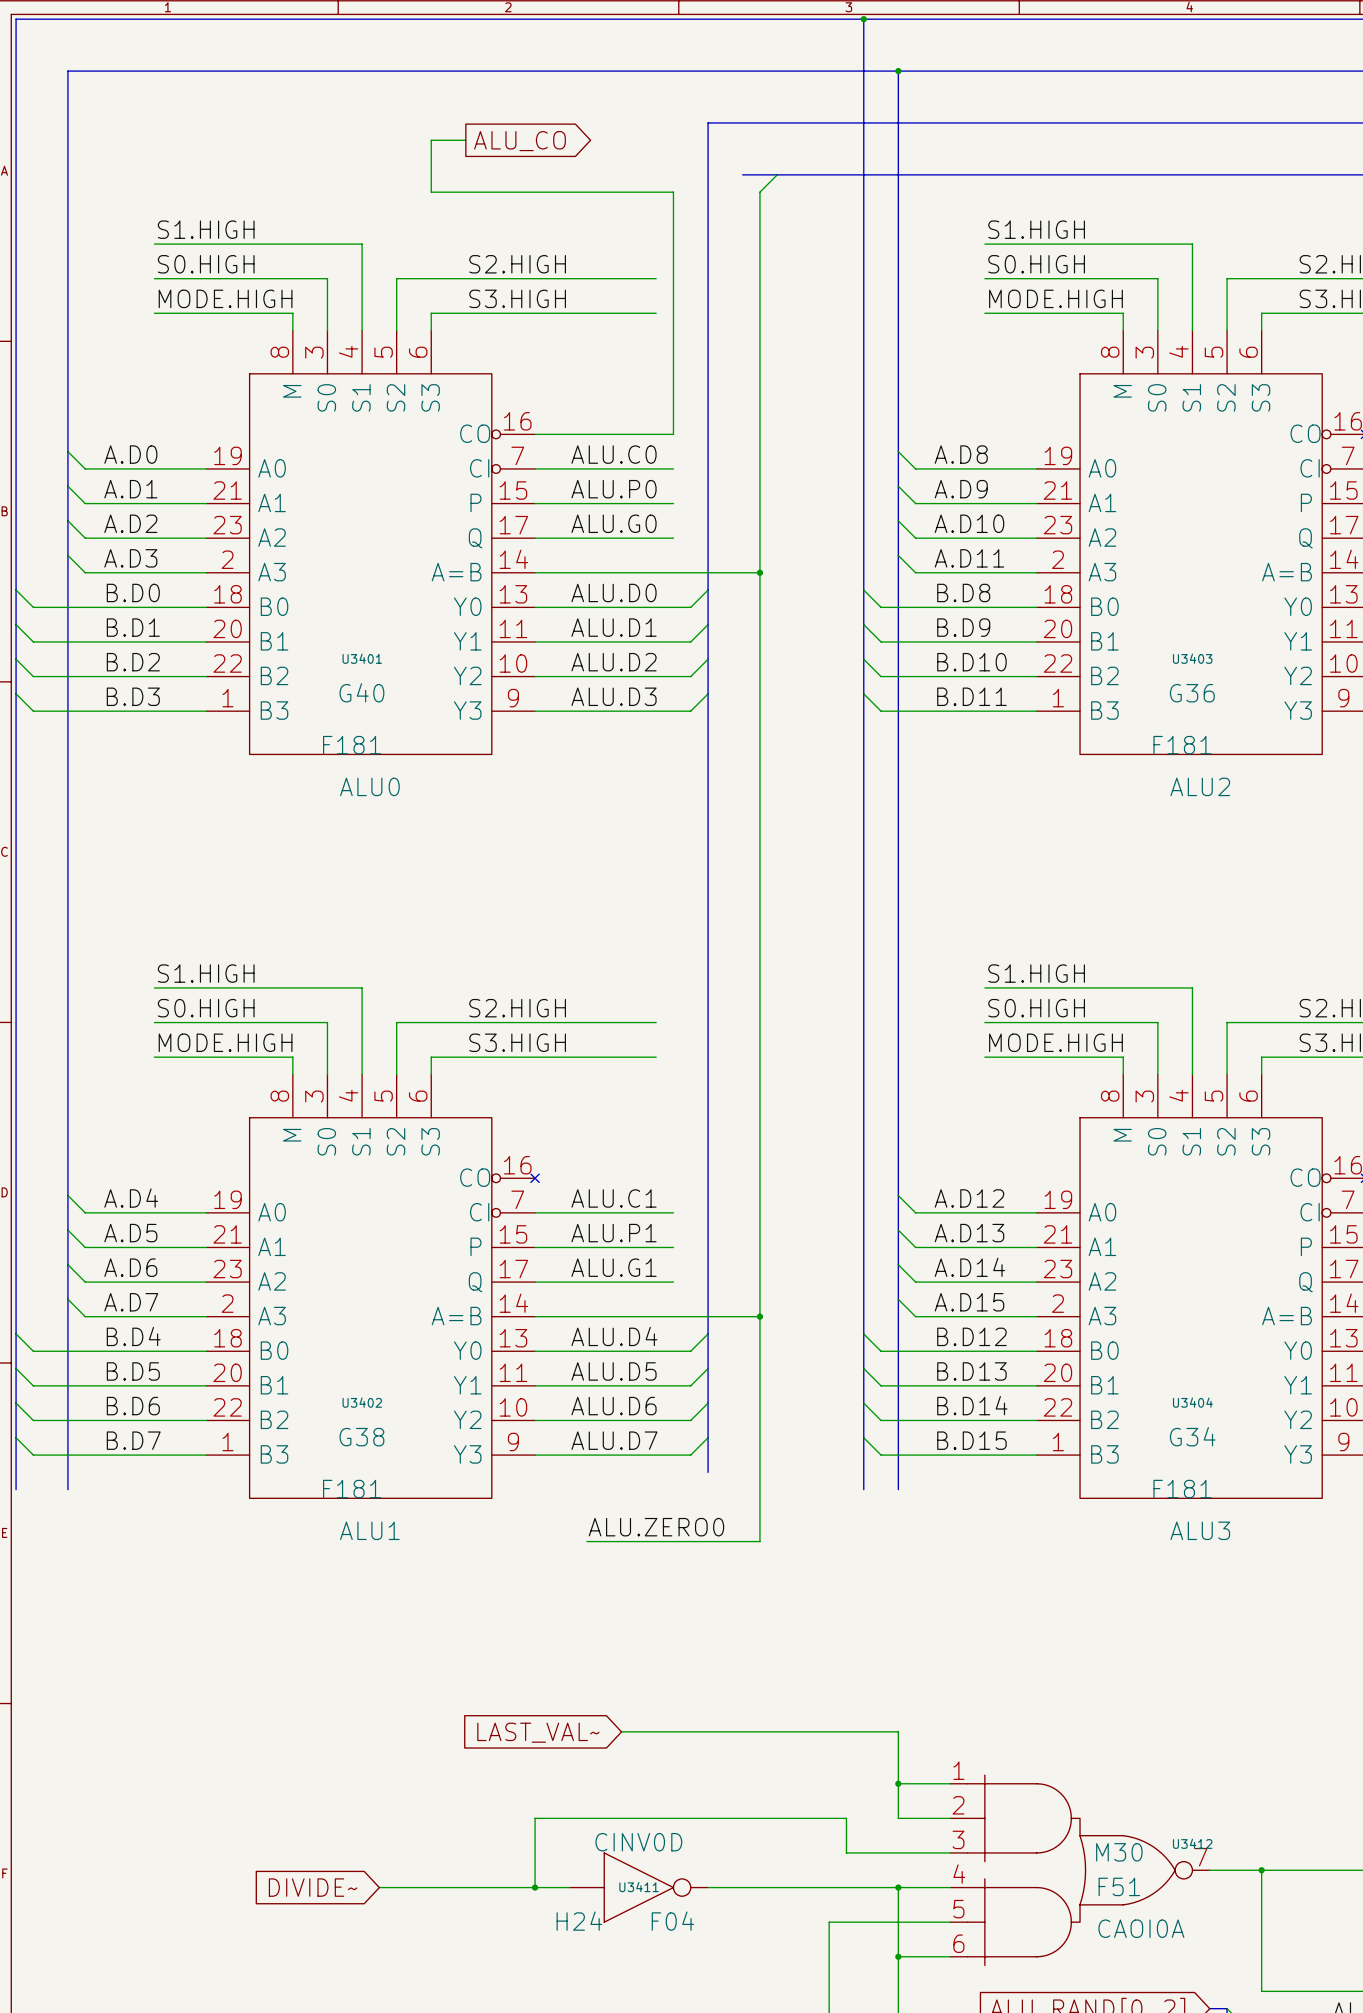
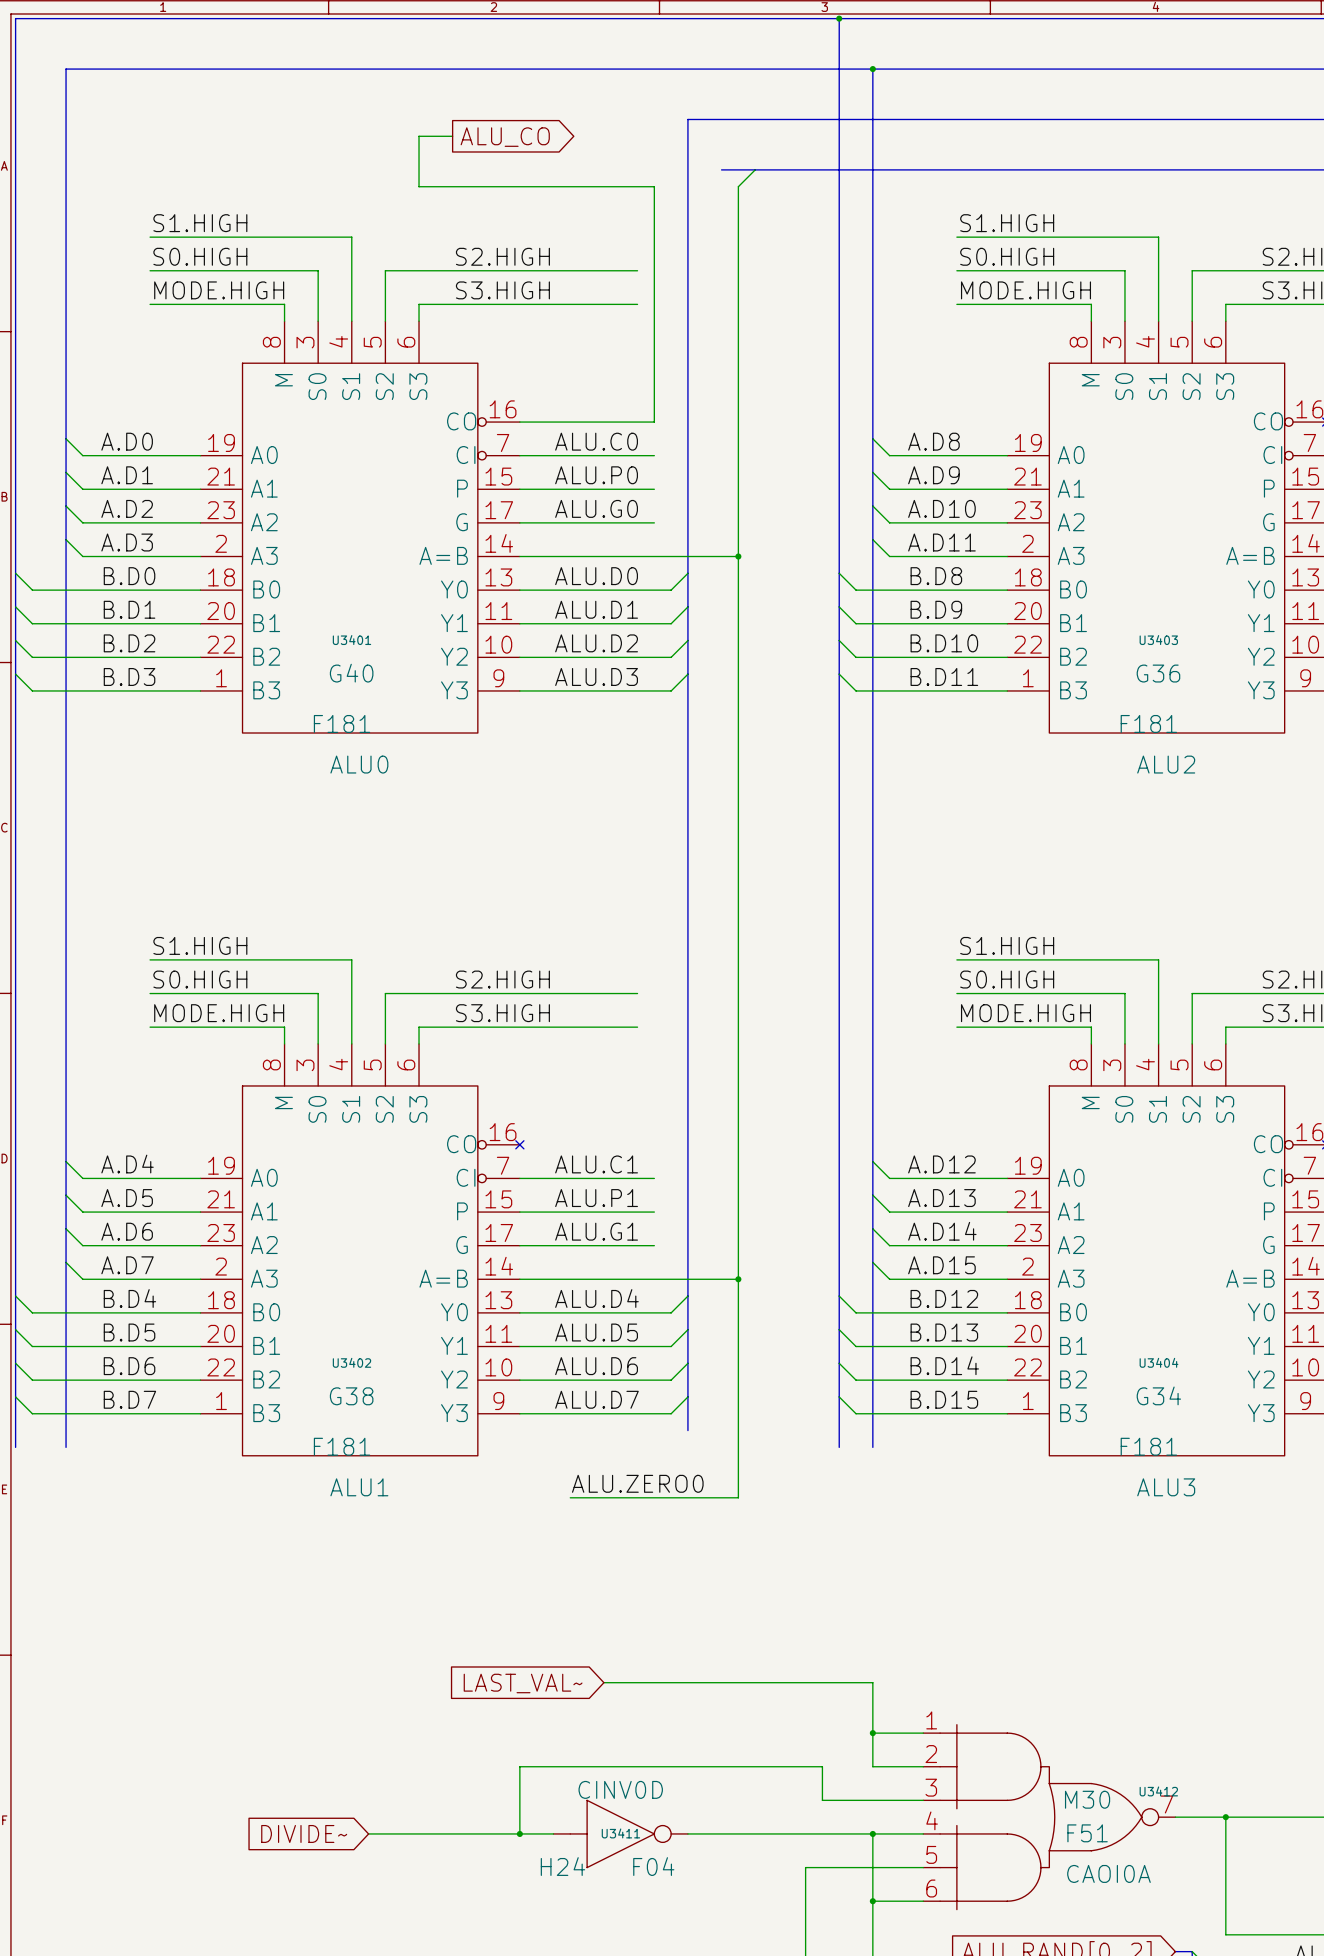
U3401 pin name: Q (475, 538) -> G (462, 522)
U3403 pin name: Q (1305, 538) -> G (1268, 522)
U3402 pin name: Q (475, 1282) -> G (462, 1245)
U3404 pin name: Q (1305, 1282) -> G (1268, 1245)

